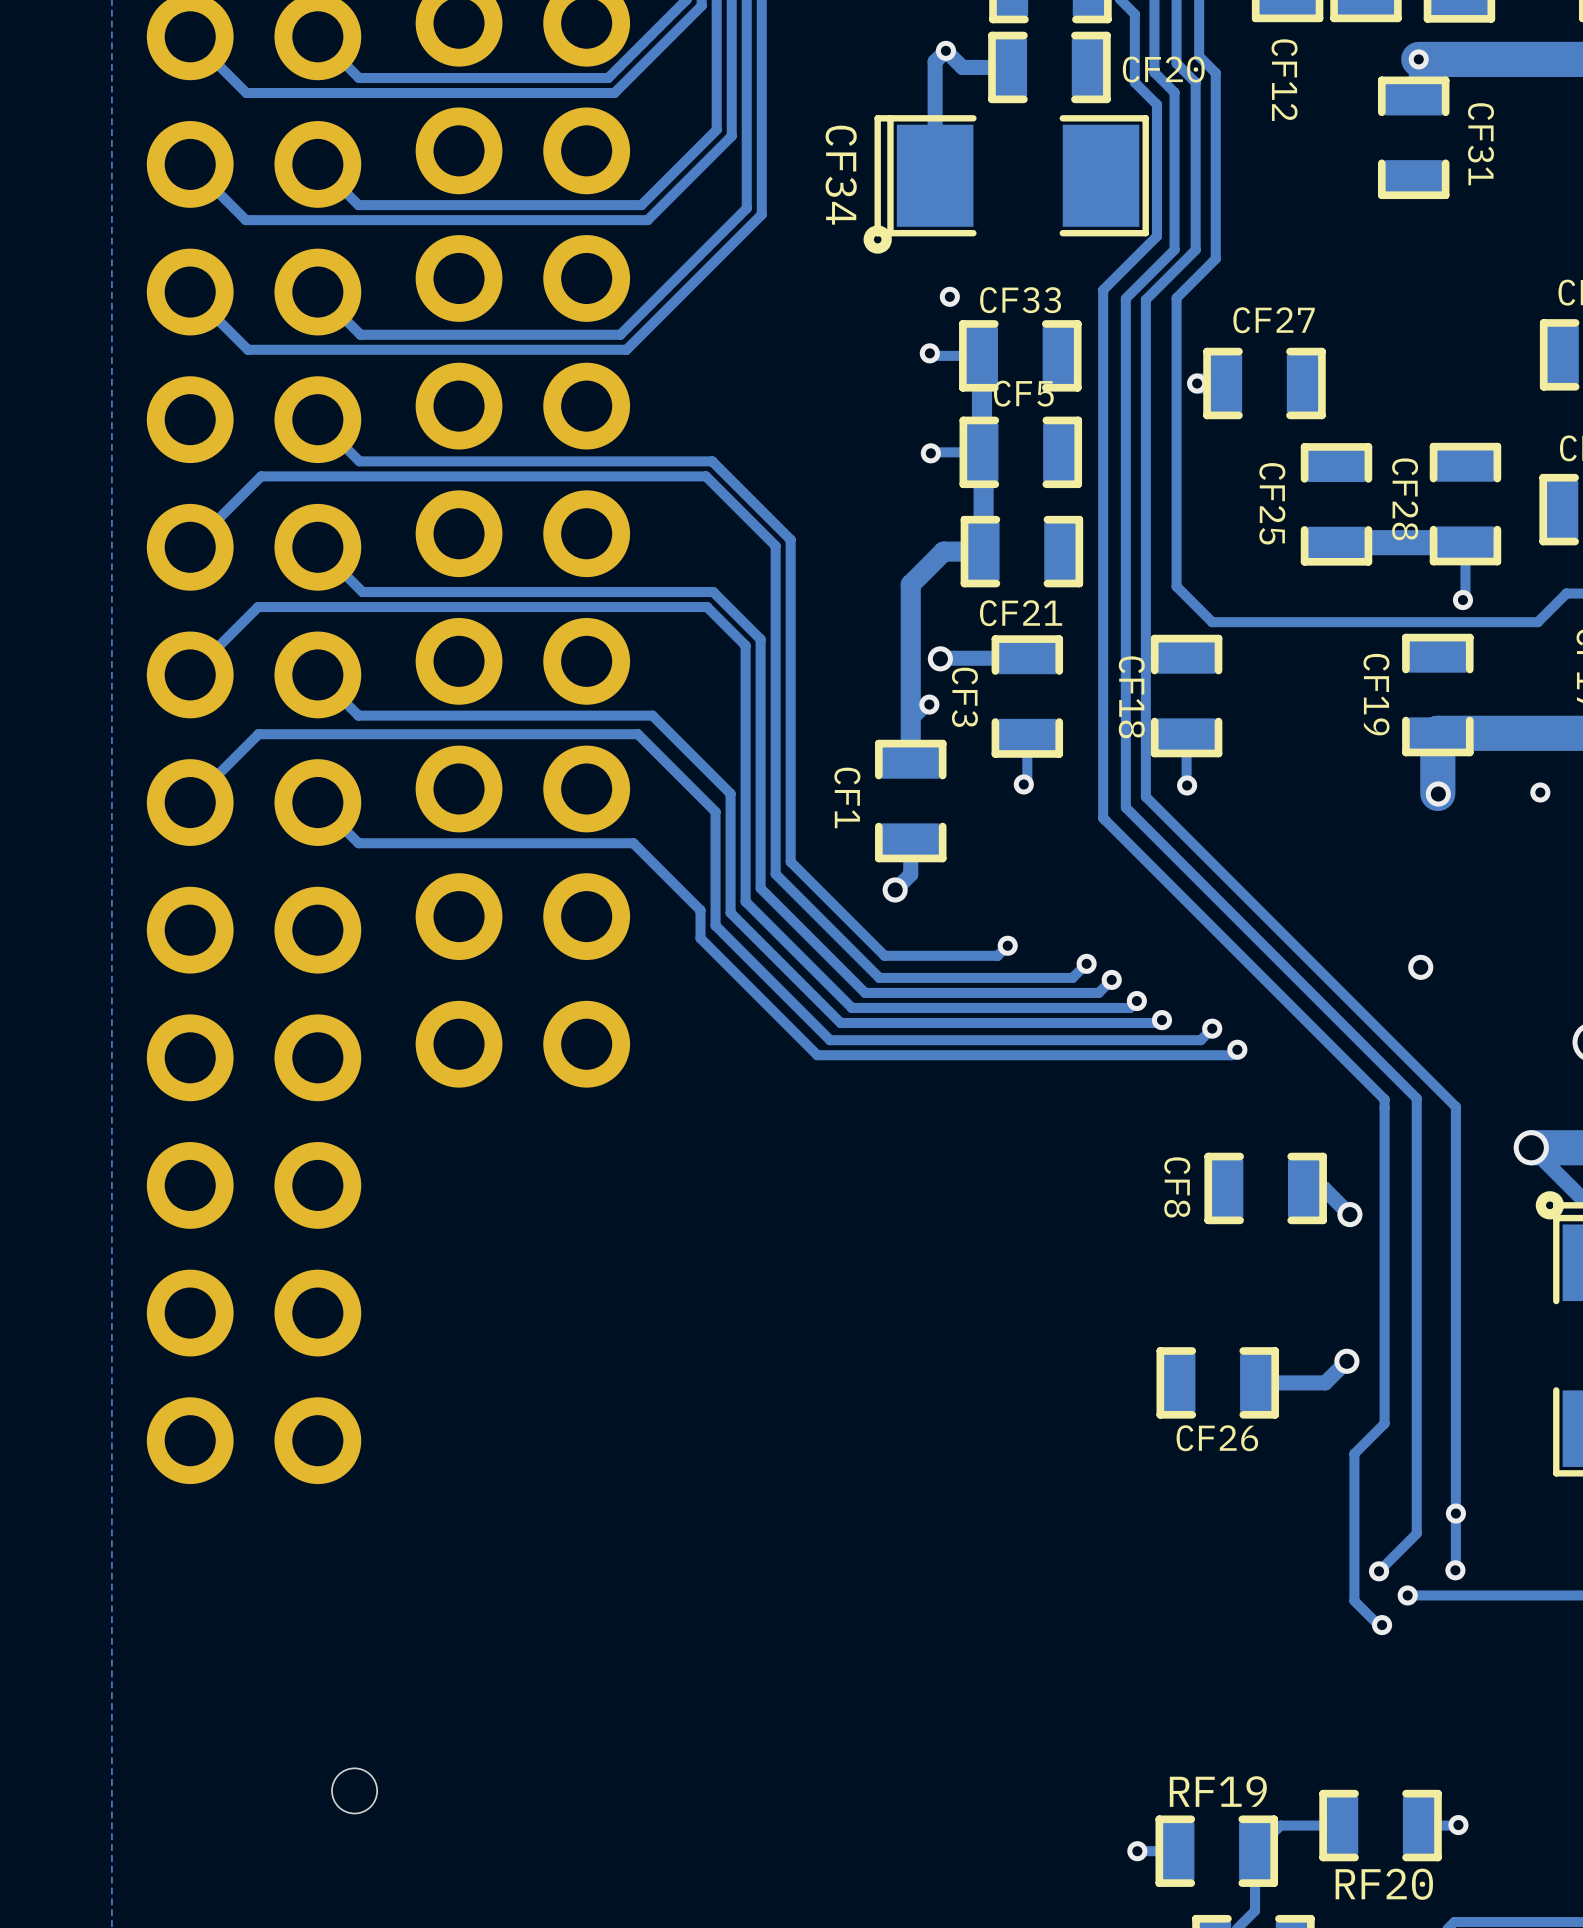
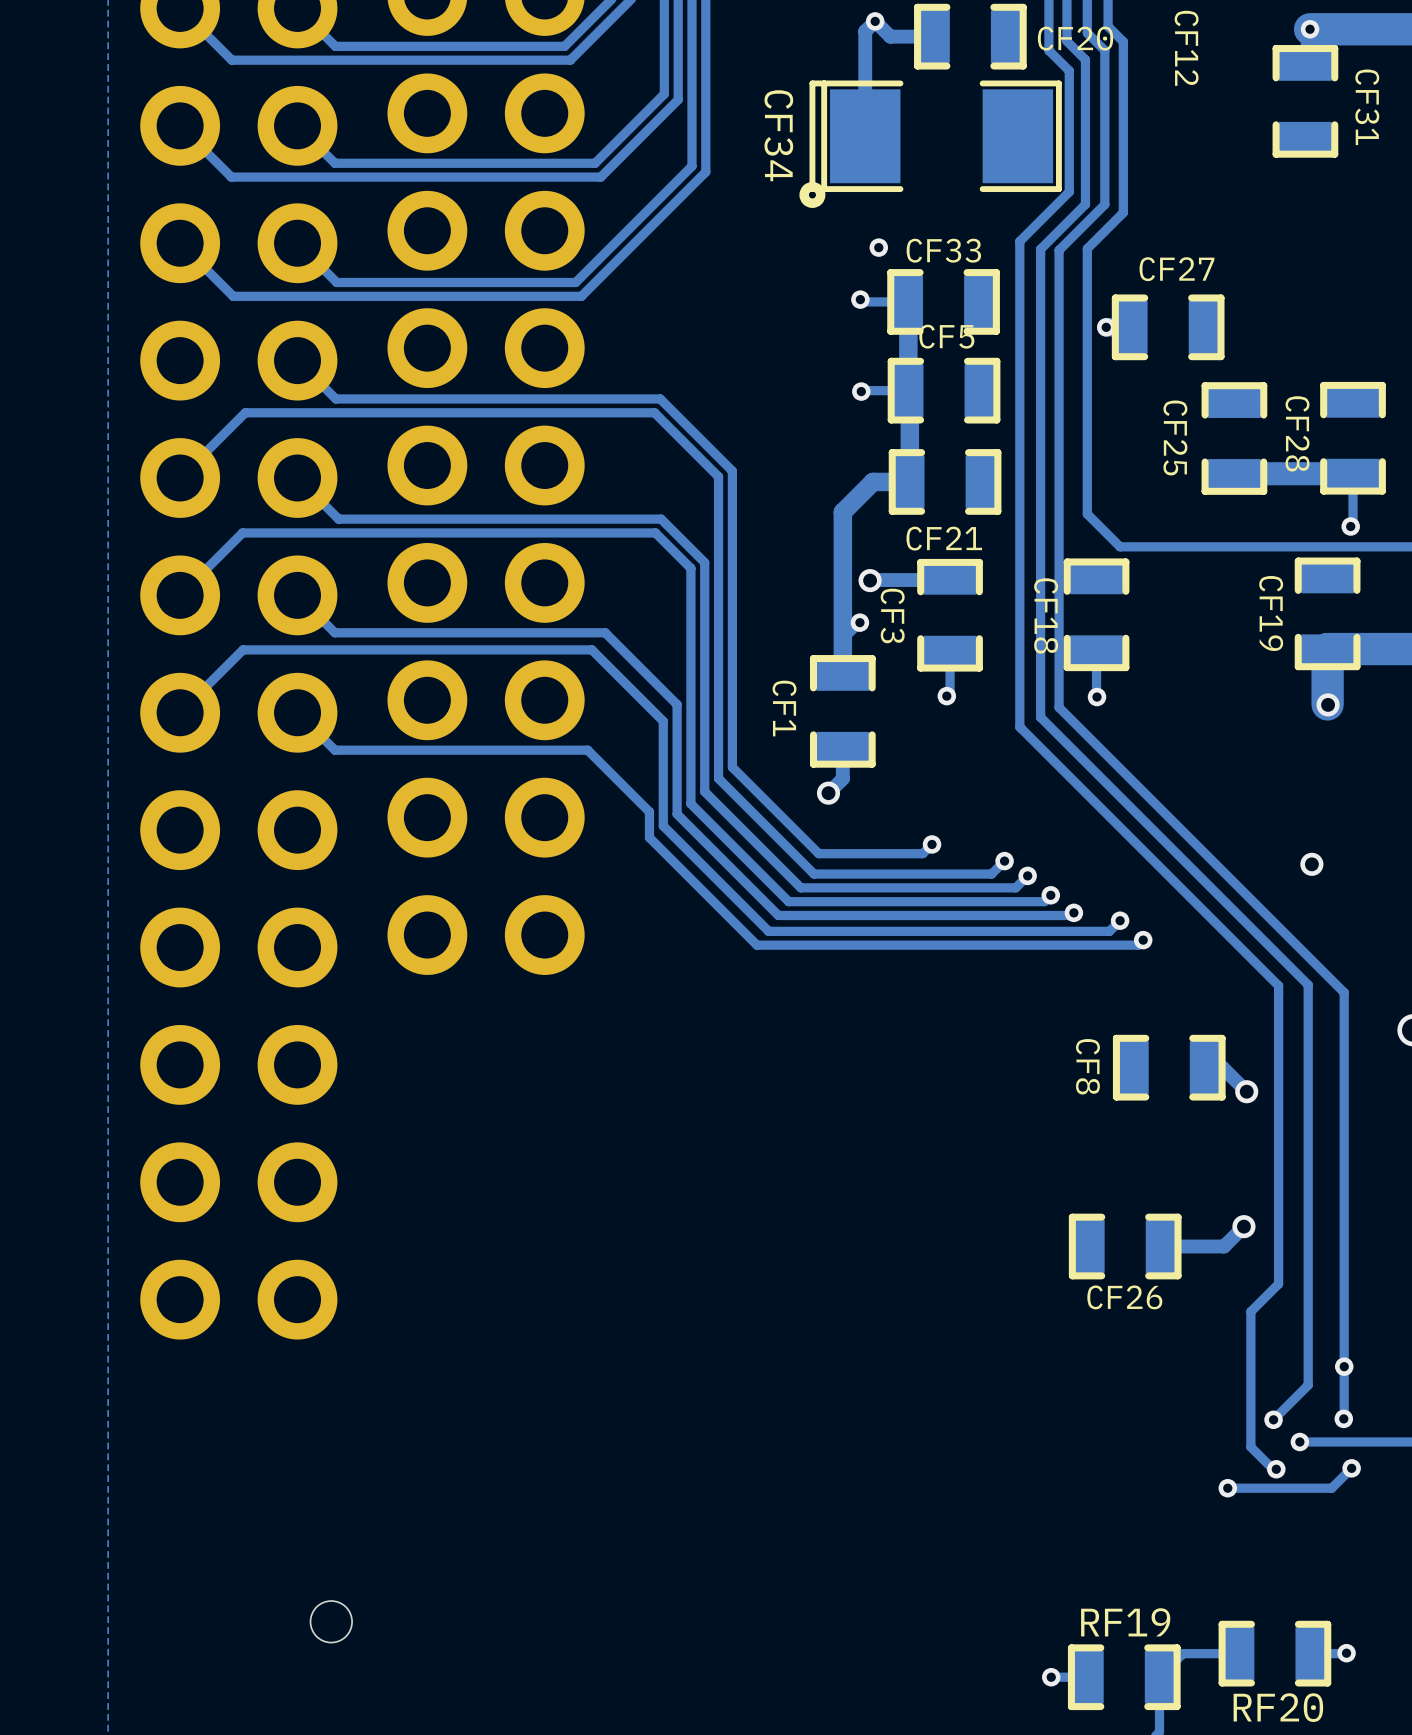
track: none -> (1351, 1468) (1331, 1488) (1227, 1488)
via: none -> (1351, 1468)
via: none -> (1227, 1488)

